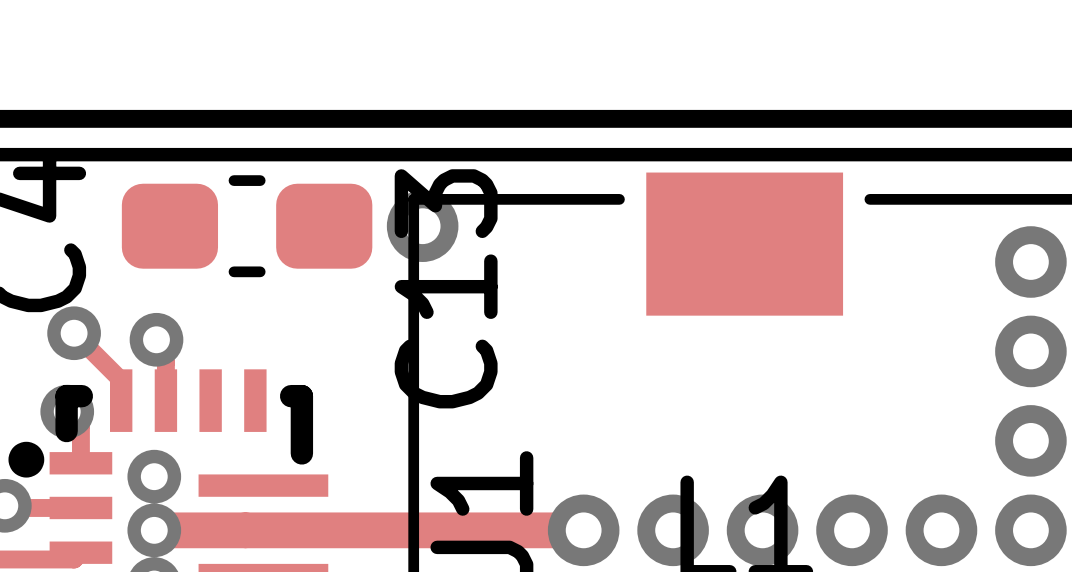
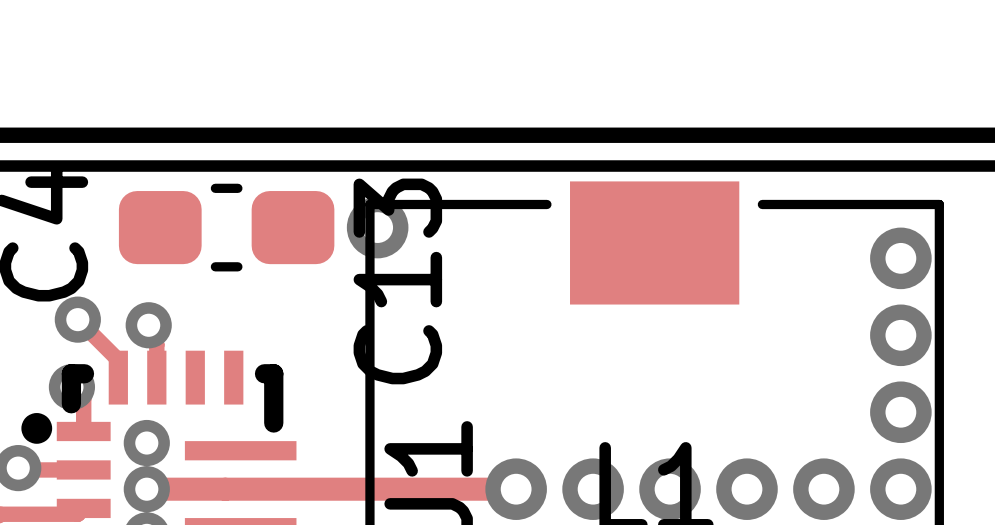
track width: thick (154, 530) (583, 530) -> thin (146, 489) (516, 489)

